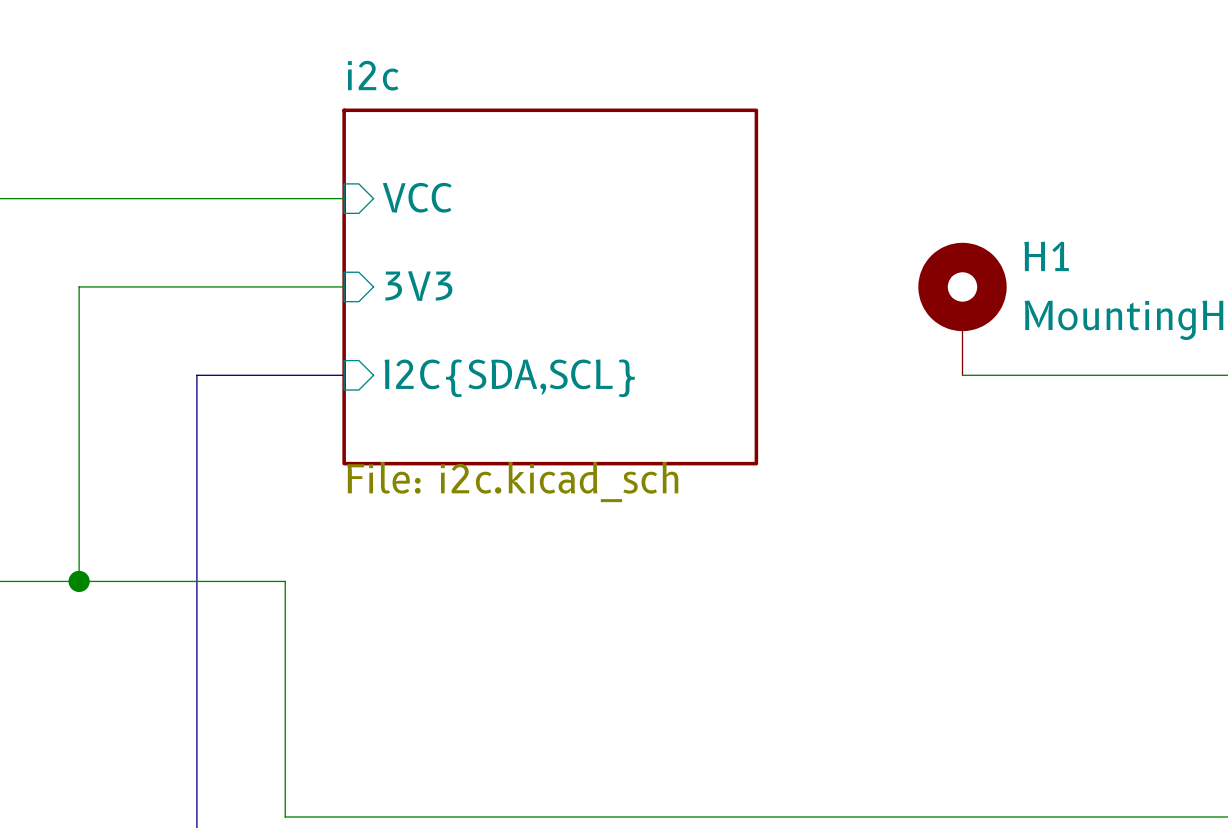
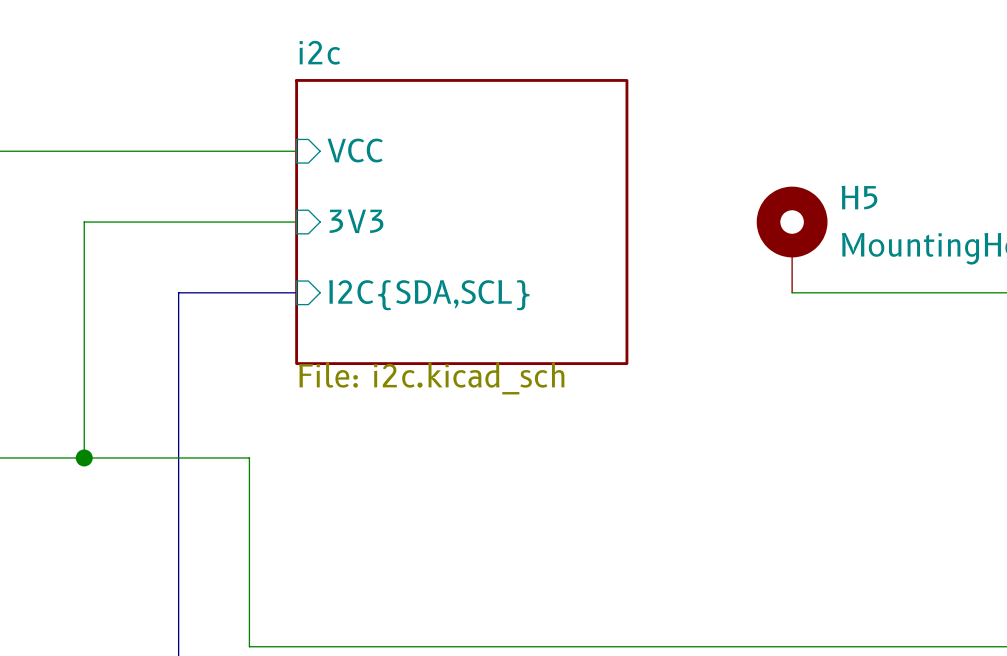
H1 name: H1 (1046, 256) -> H5 (859, 197)

